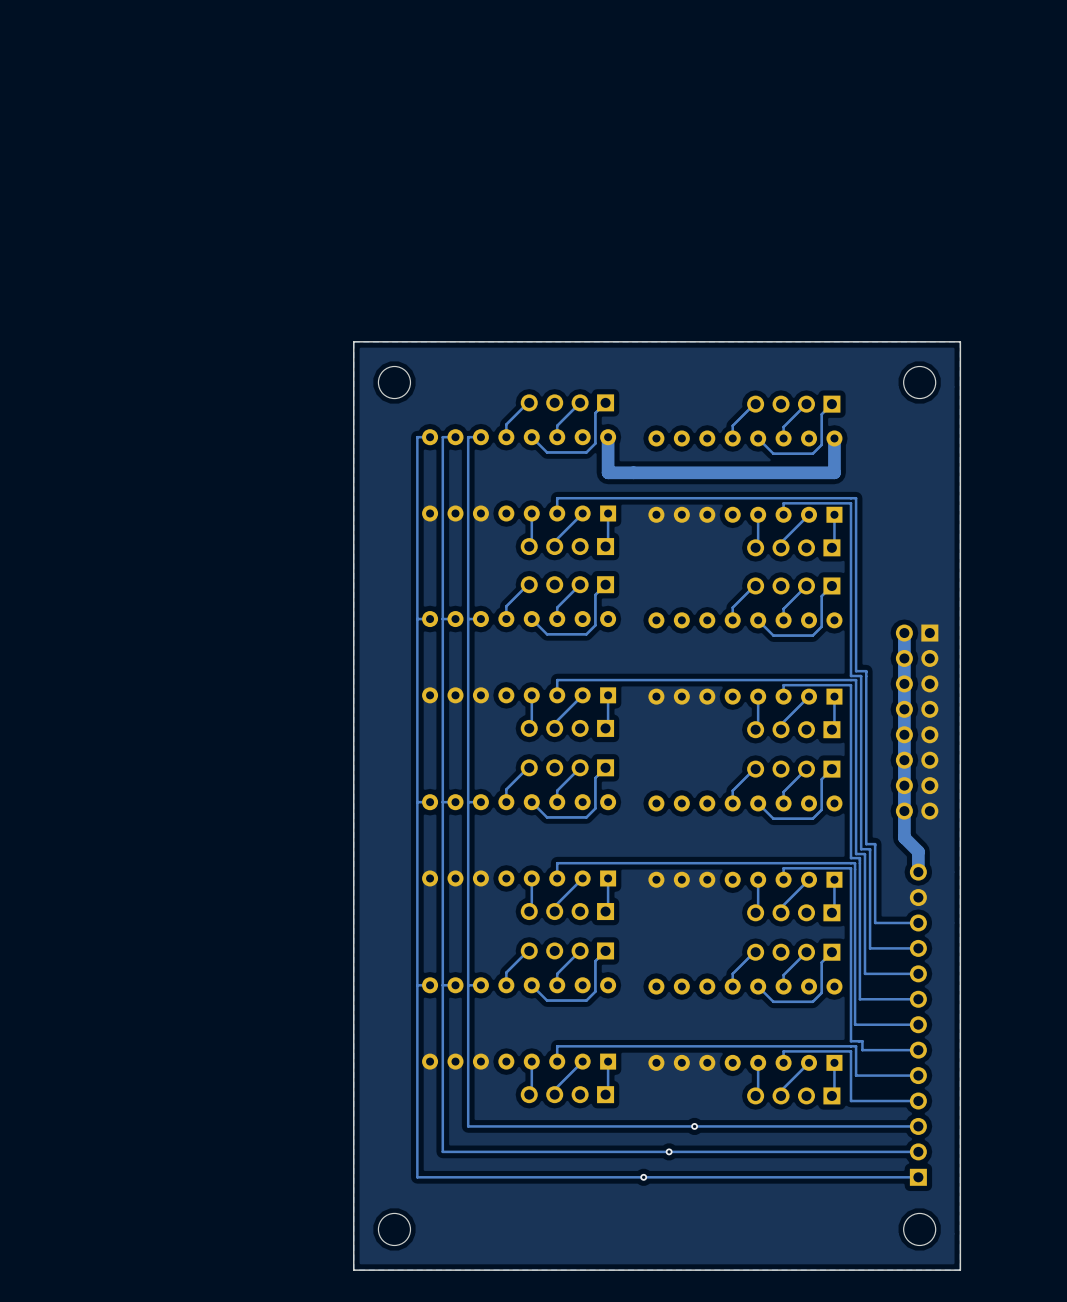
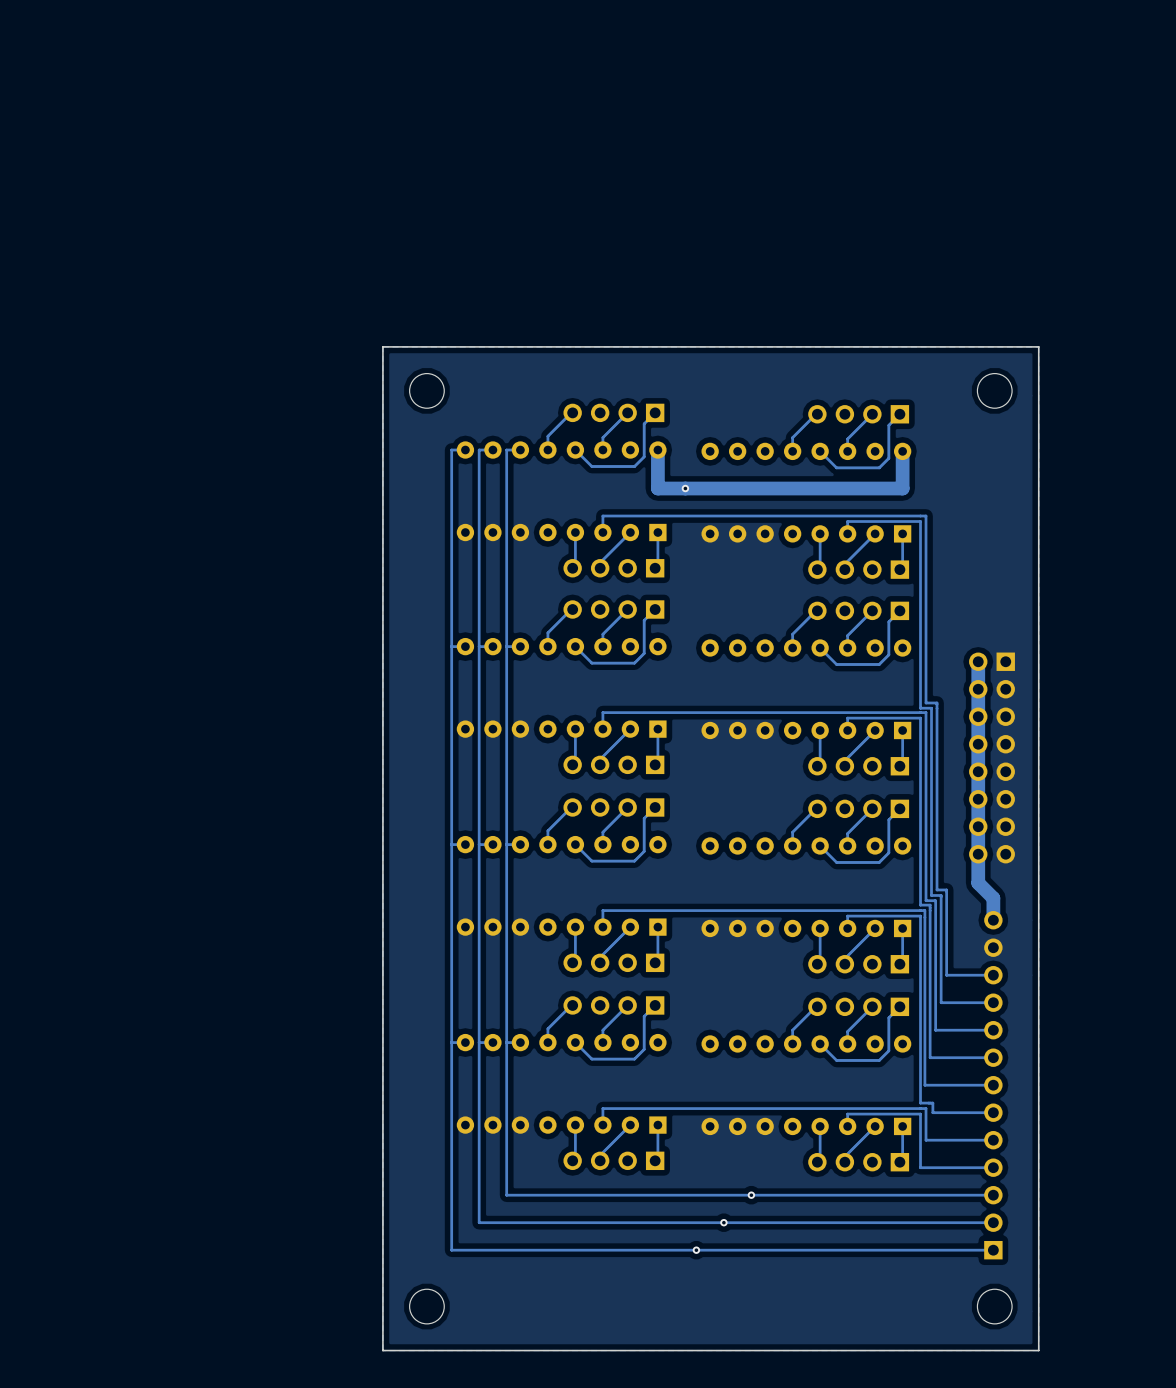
via: none -> (685, 488)

